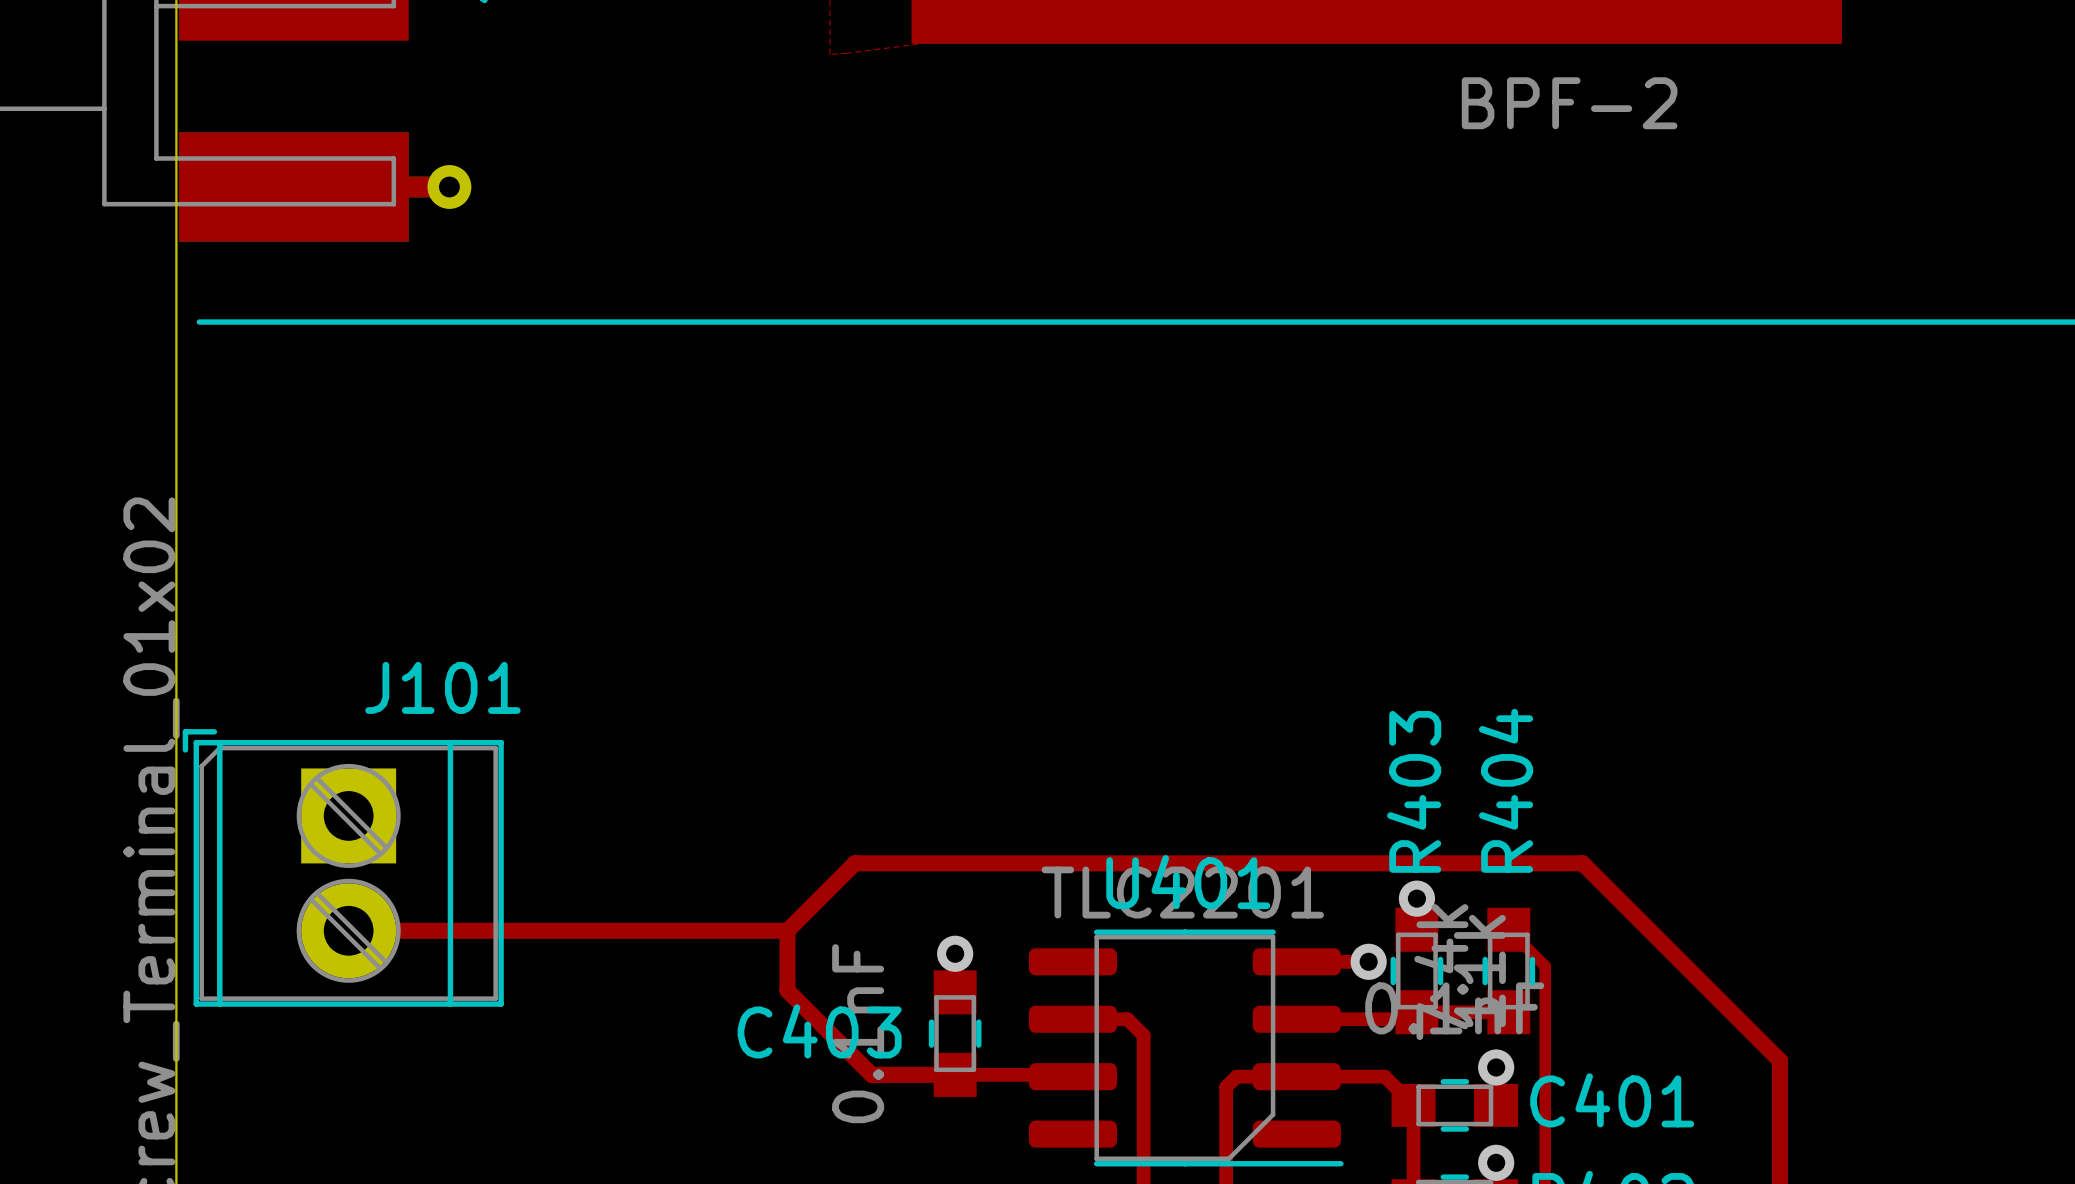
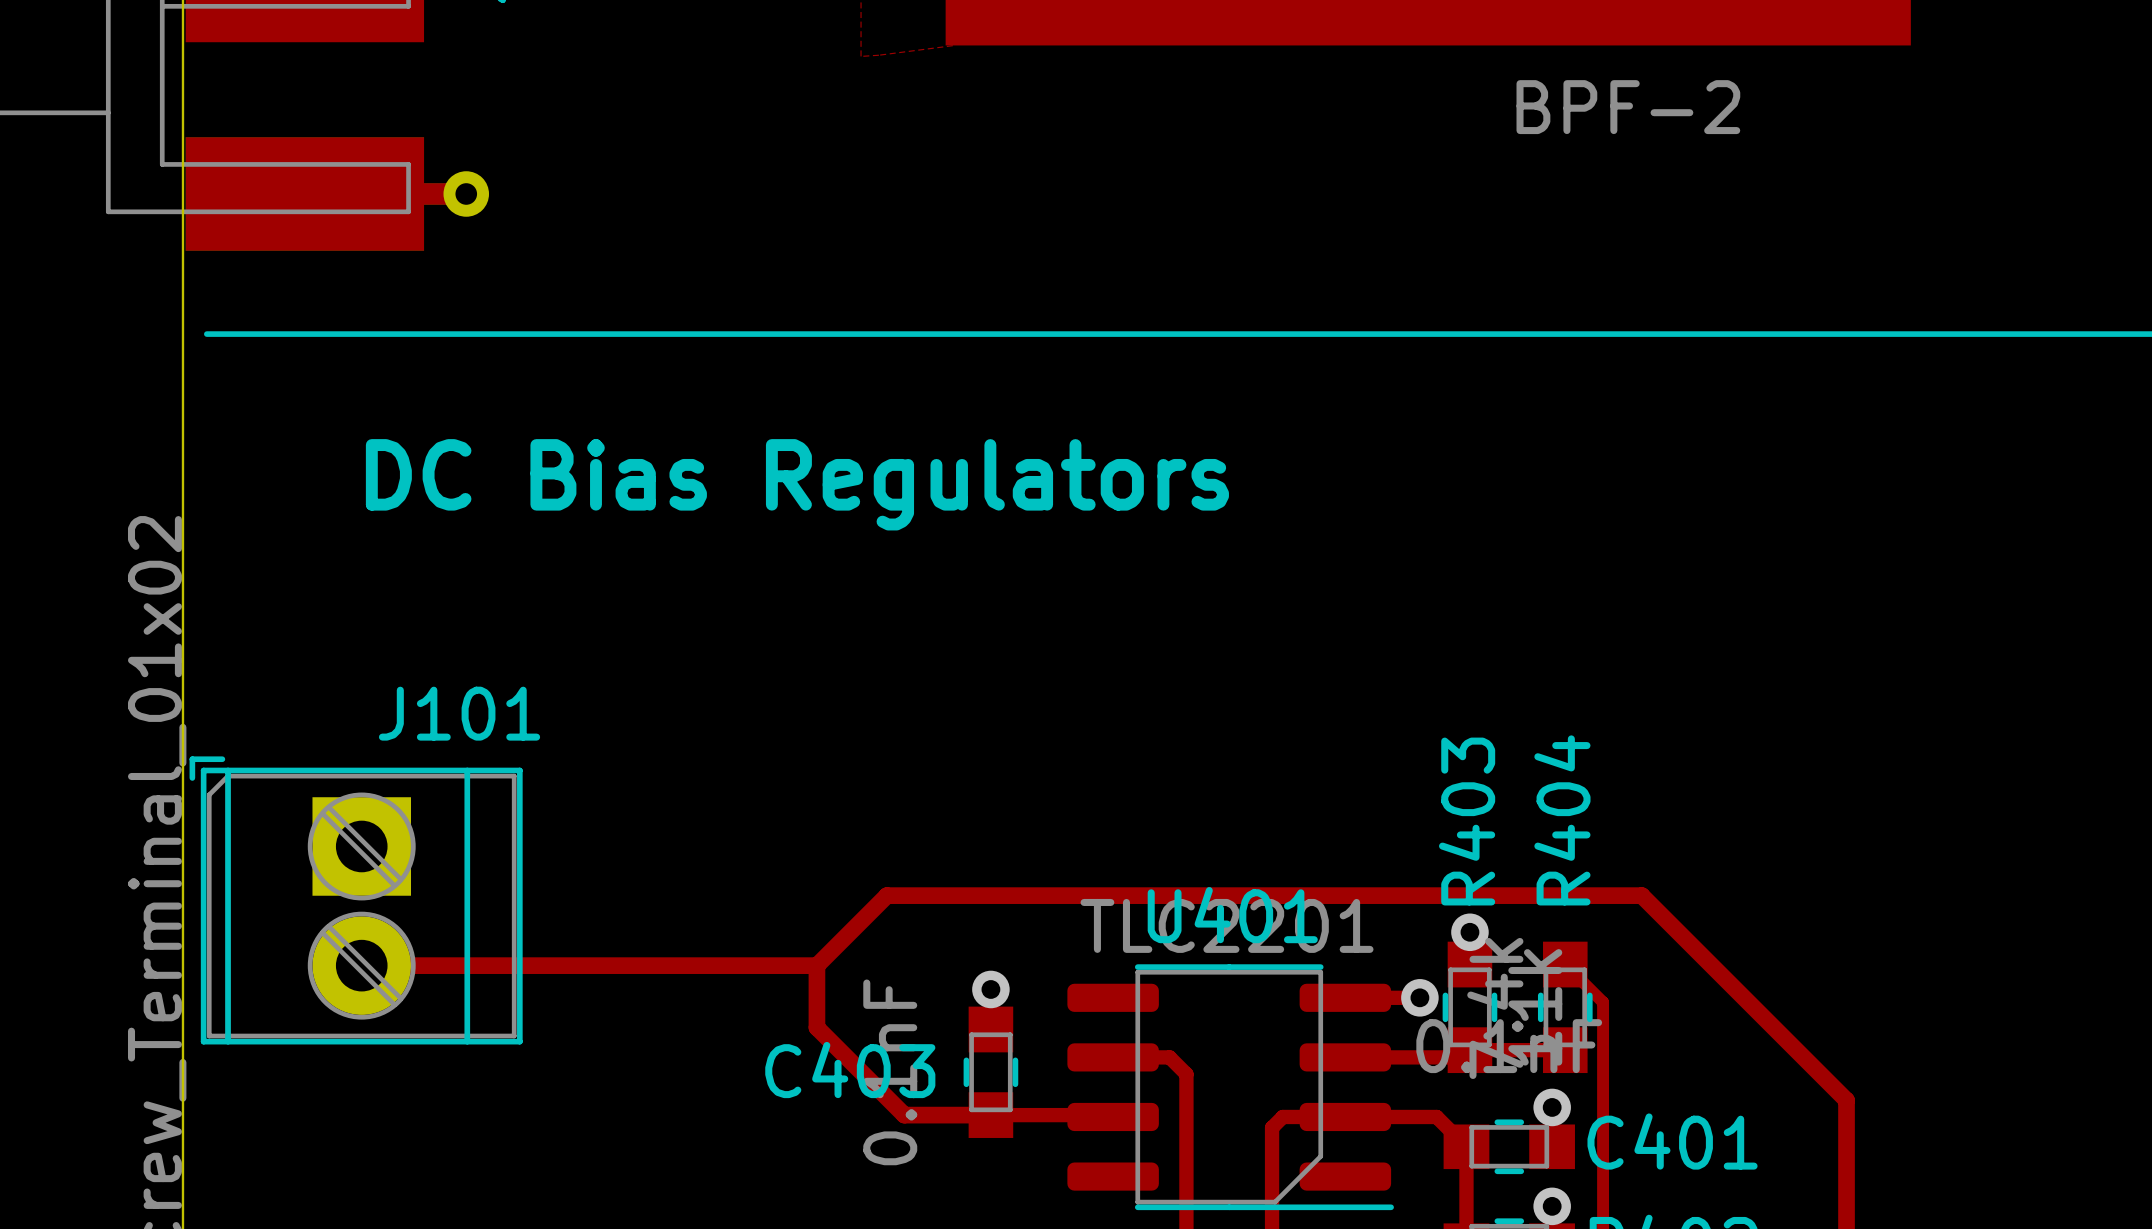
text: none -> DC Bias Regulators (797, 484)

